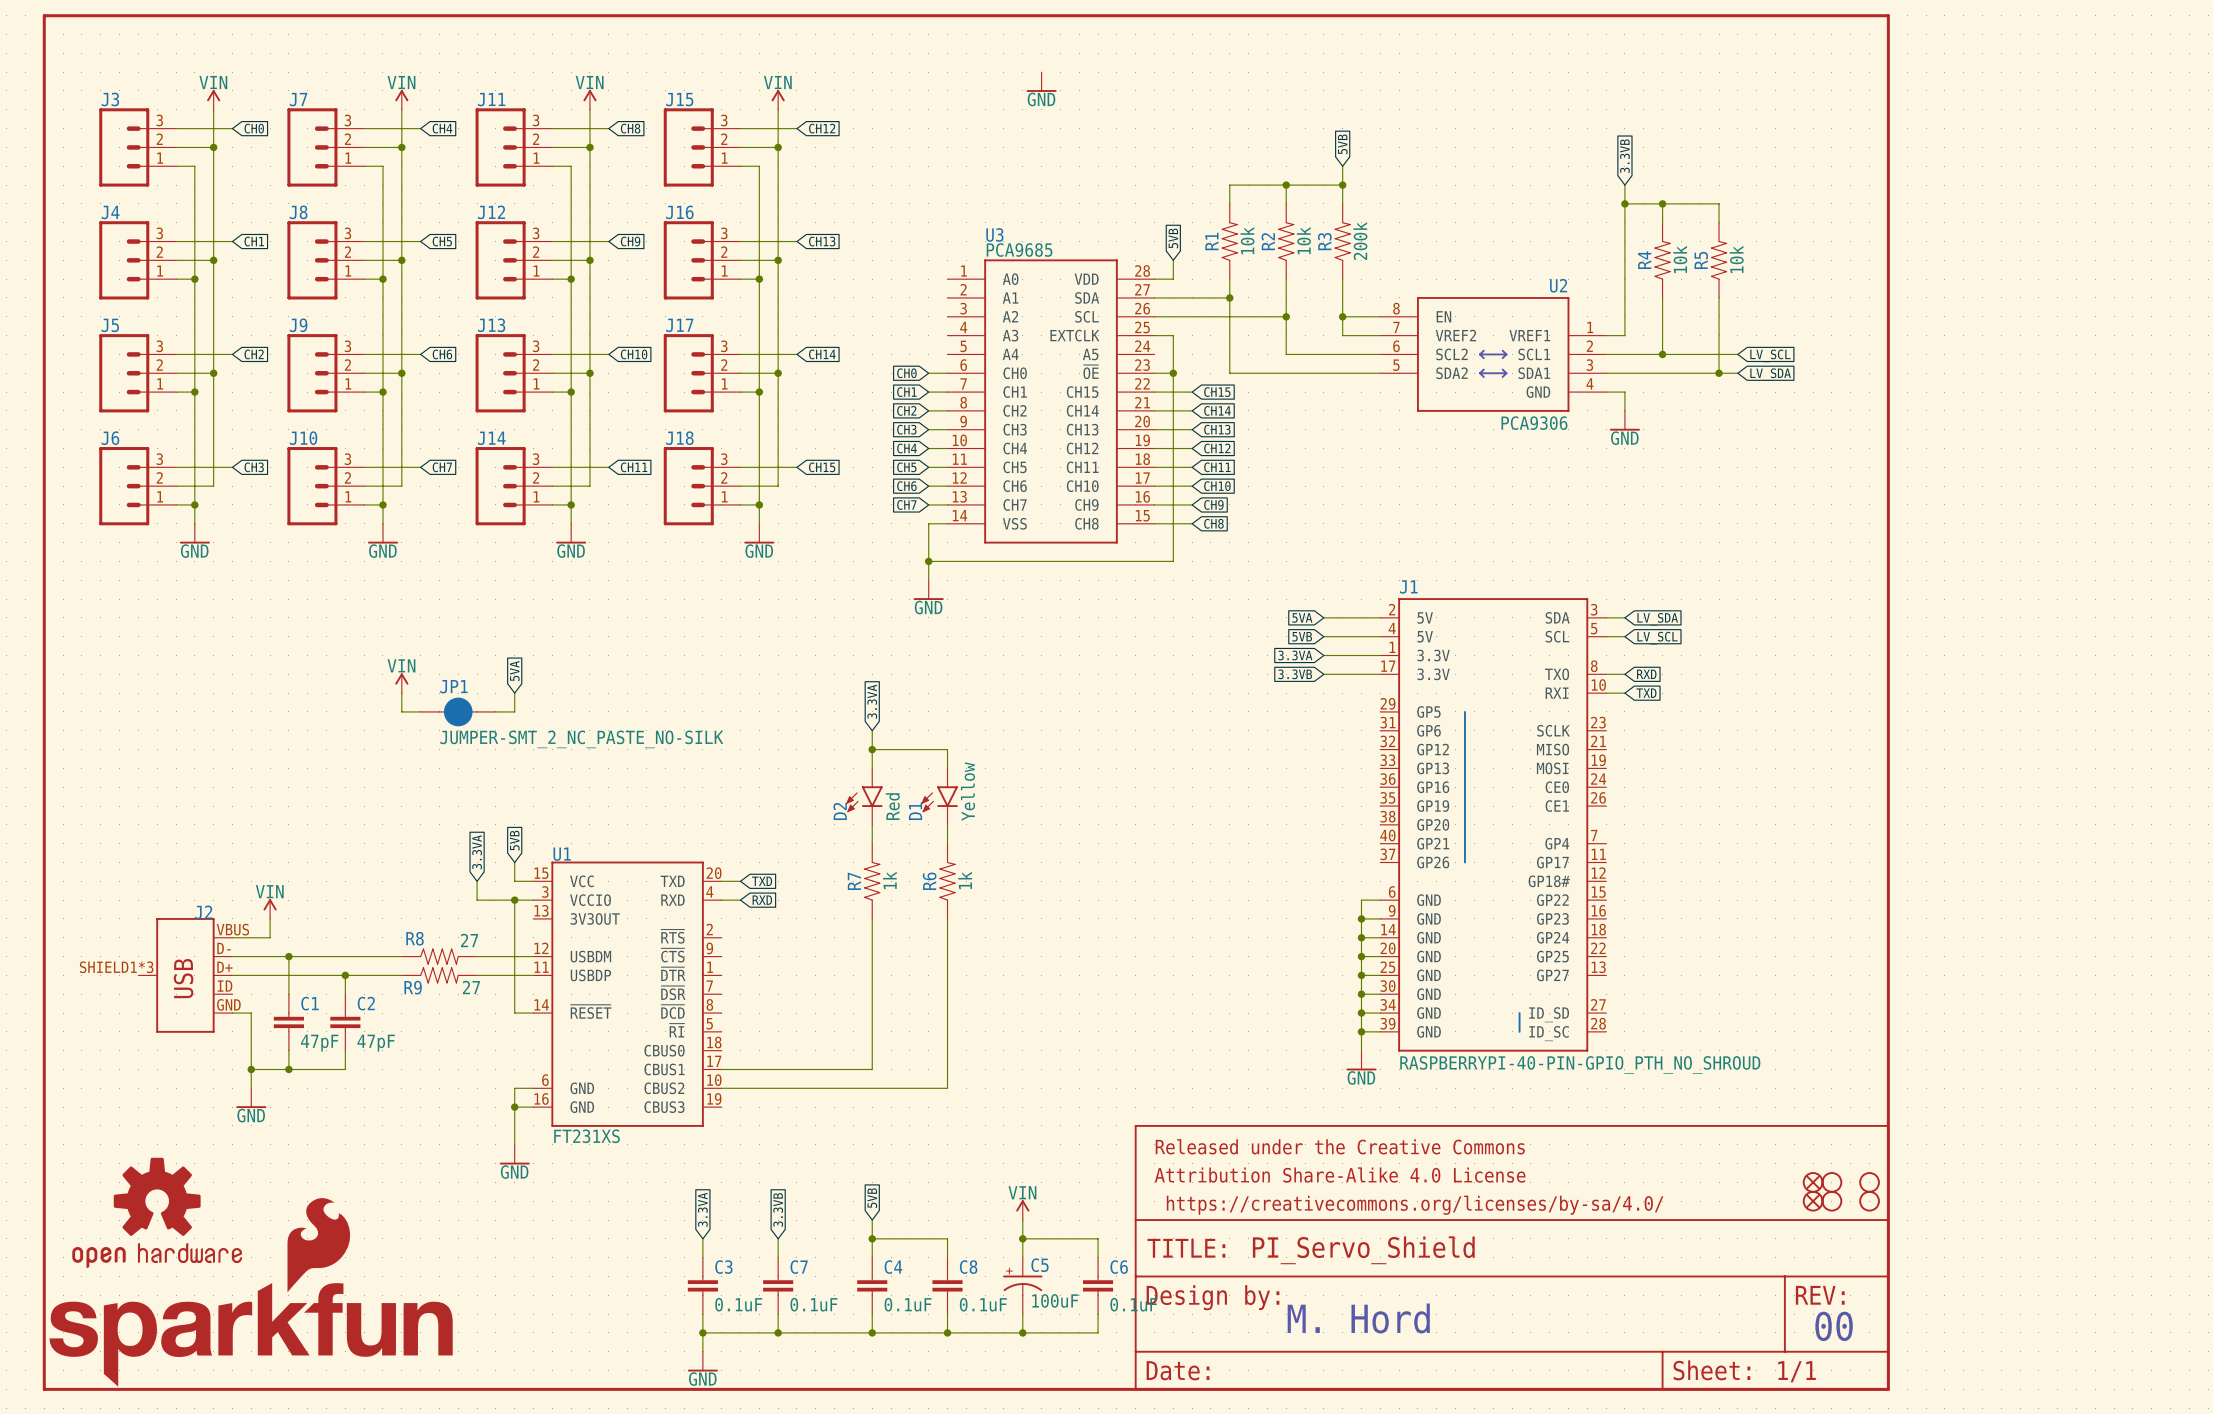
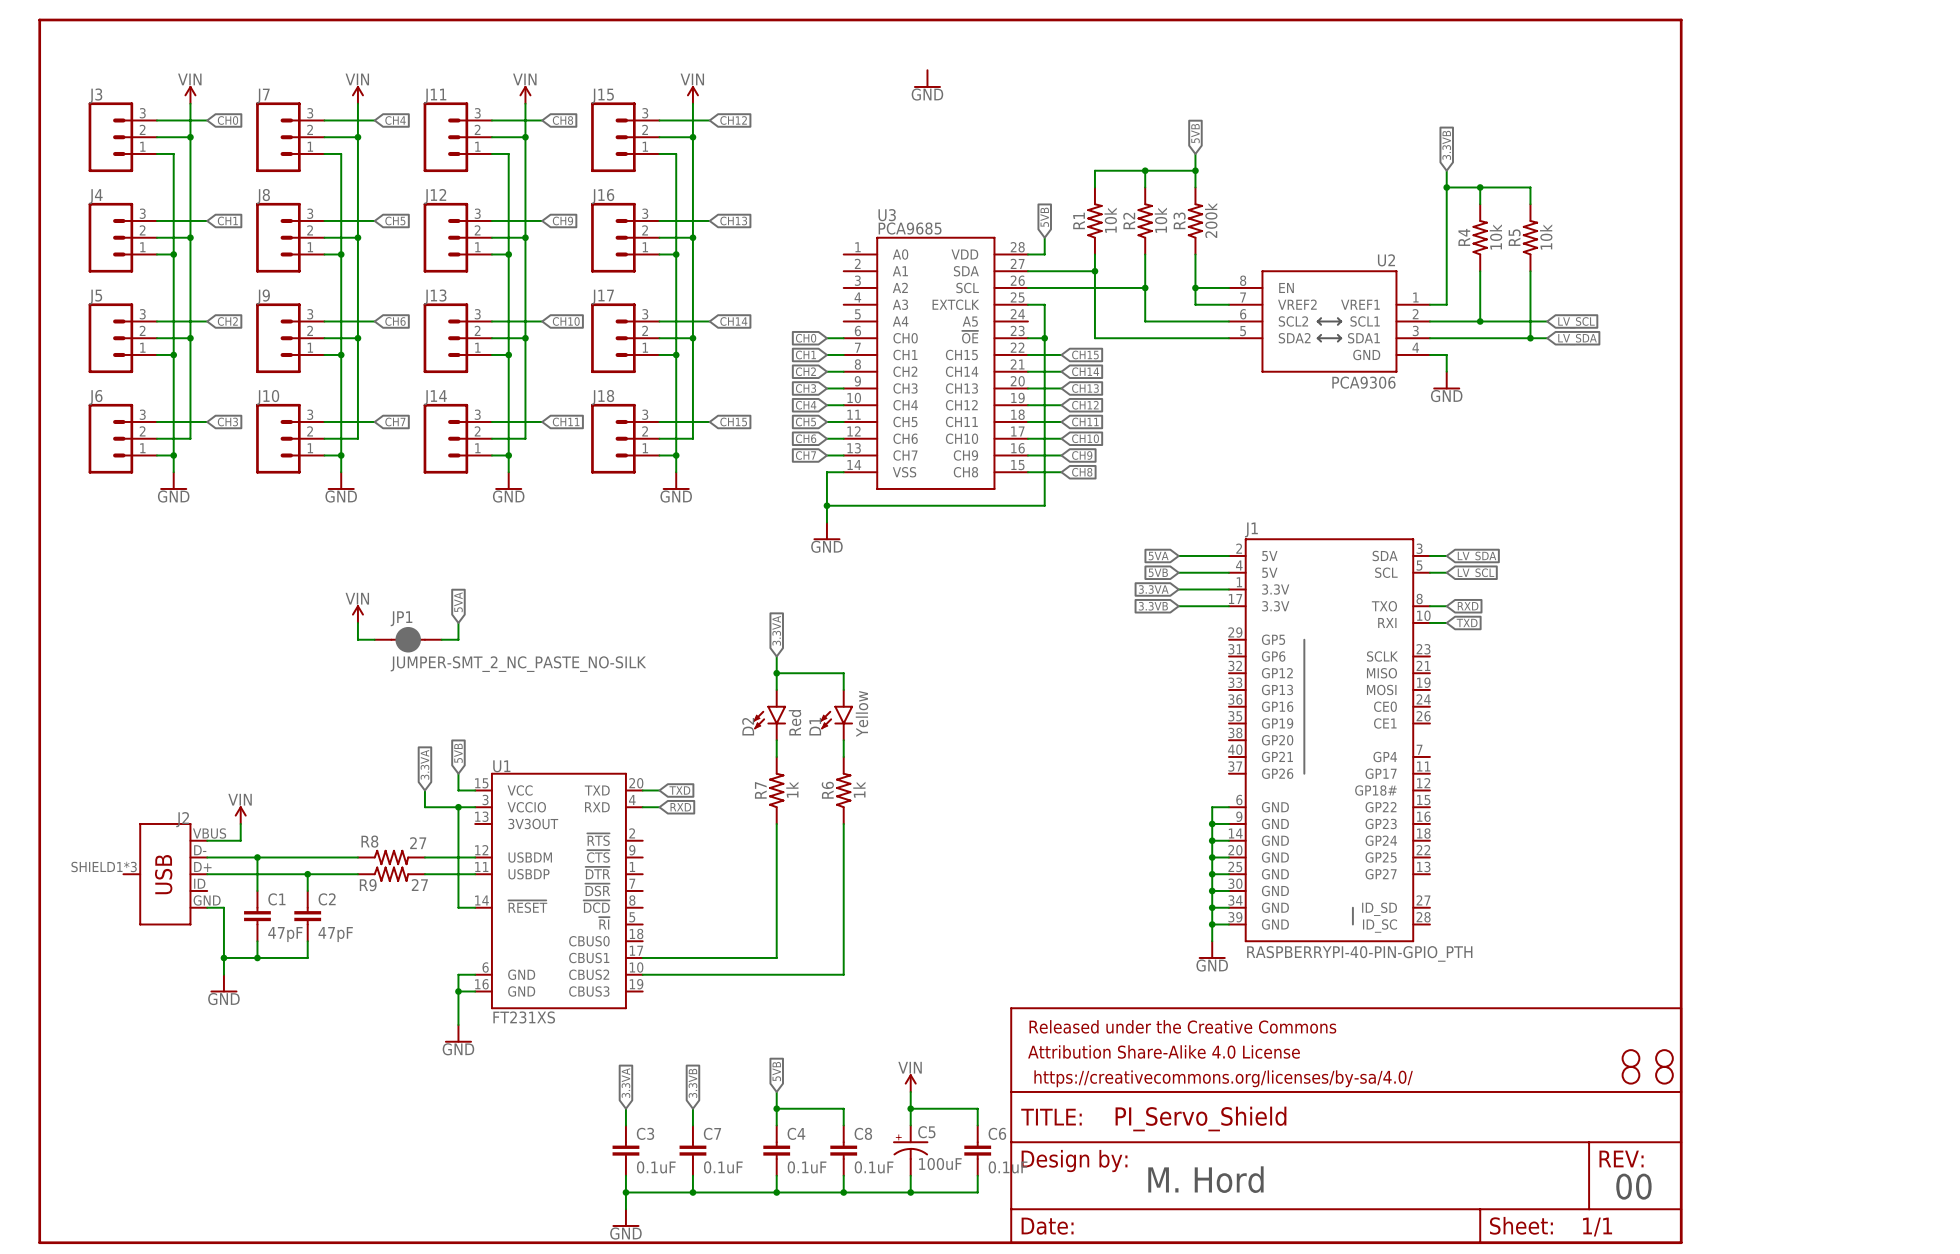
J1 value: RASPBERRYPI-40-PIN-GPIO_PTH_NO_SHROUD (1580, 1064) -> RASPBERRYPI-40-PIN-GPIO_PTH (1359, 953)
part: (1813, 1182) -> none
part: (1813, 1201) -> none
part: (157, 1212) -> none
part: (251, 1292) -> none

